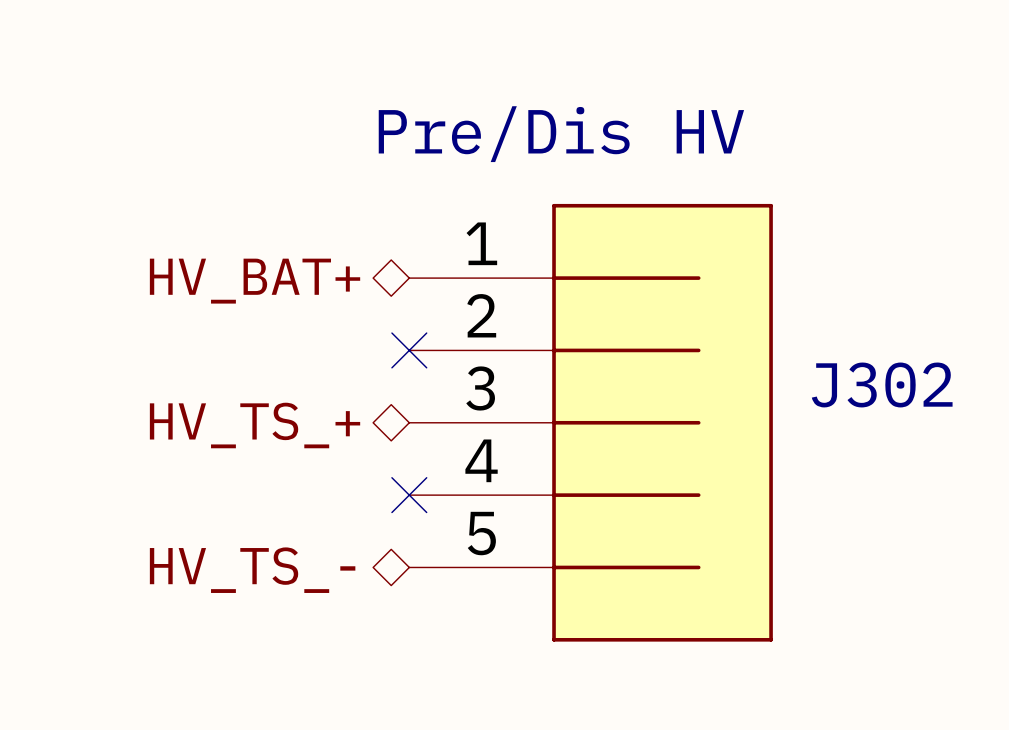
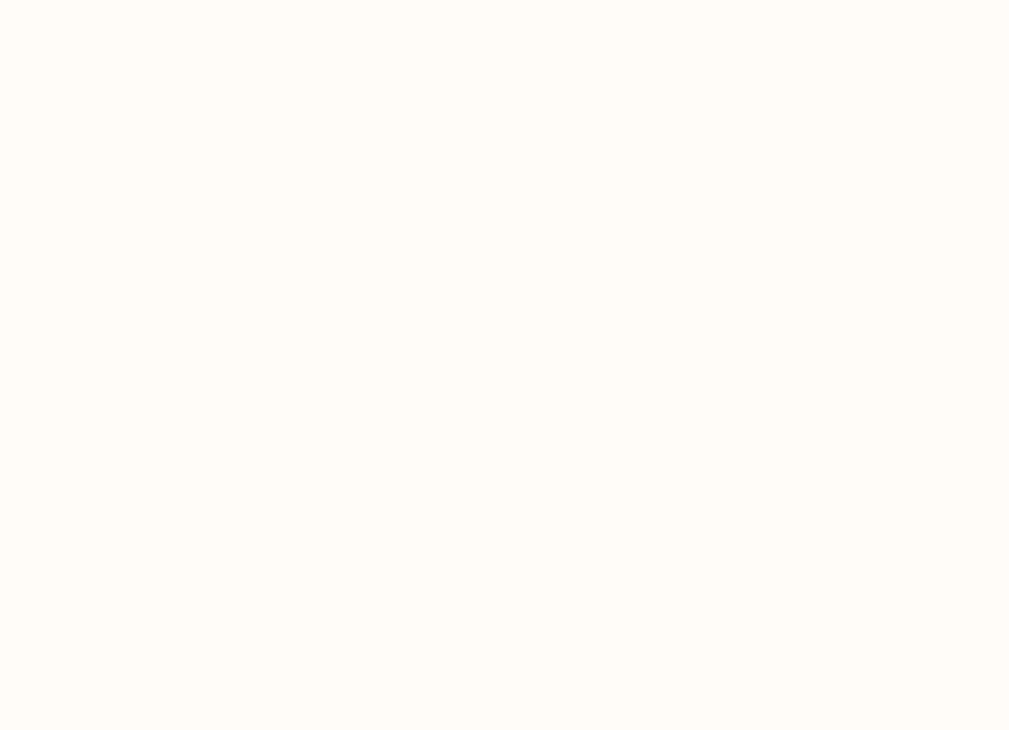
hierarchical label: HV_BAT+ (255, 281) -> none
no-connect mark: (409, 350) -> none
J302: Pre/Dis HV (591, 422) -> none
hierarchical label: HV_TS_+ (255, 425) -> none
no-connect mark: (409, 495) -> none
hierarchical label: HV_TS_- (252, 570) -> none

